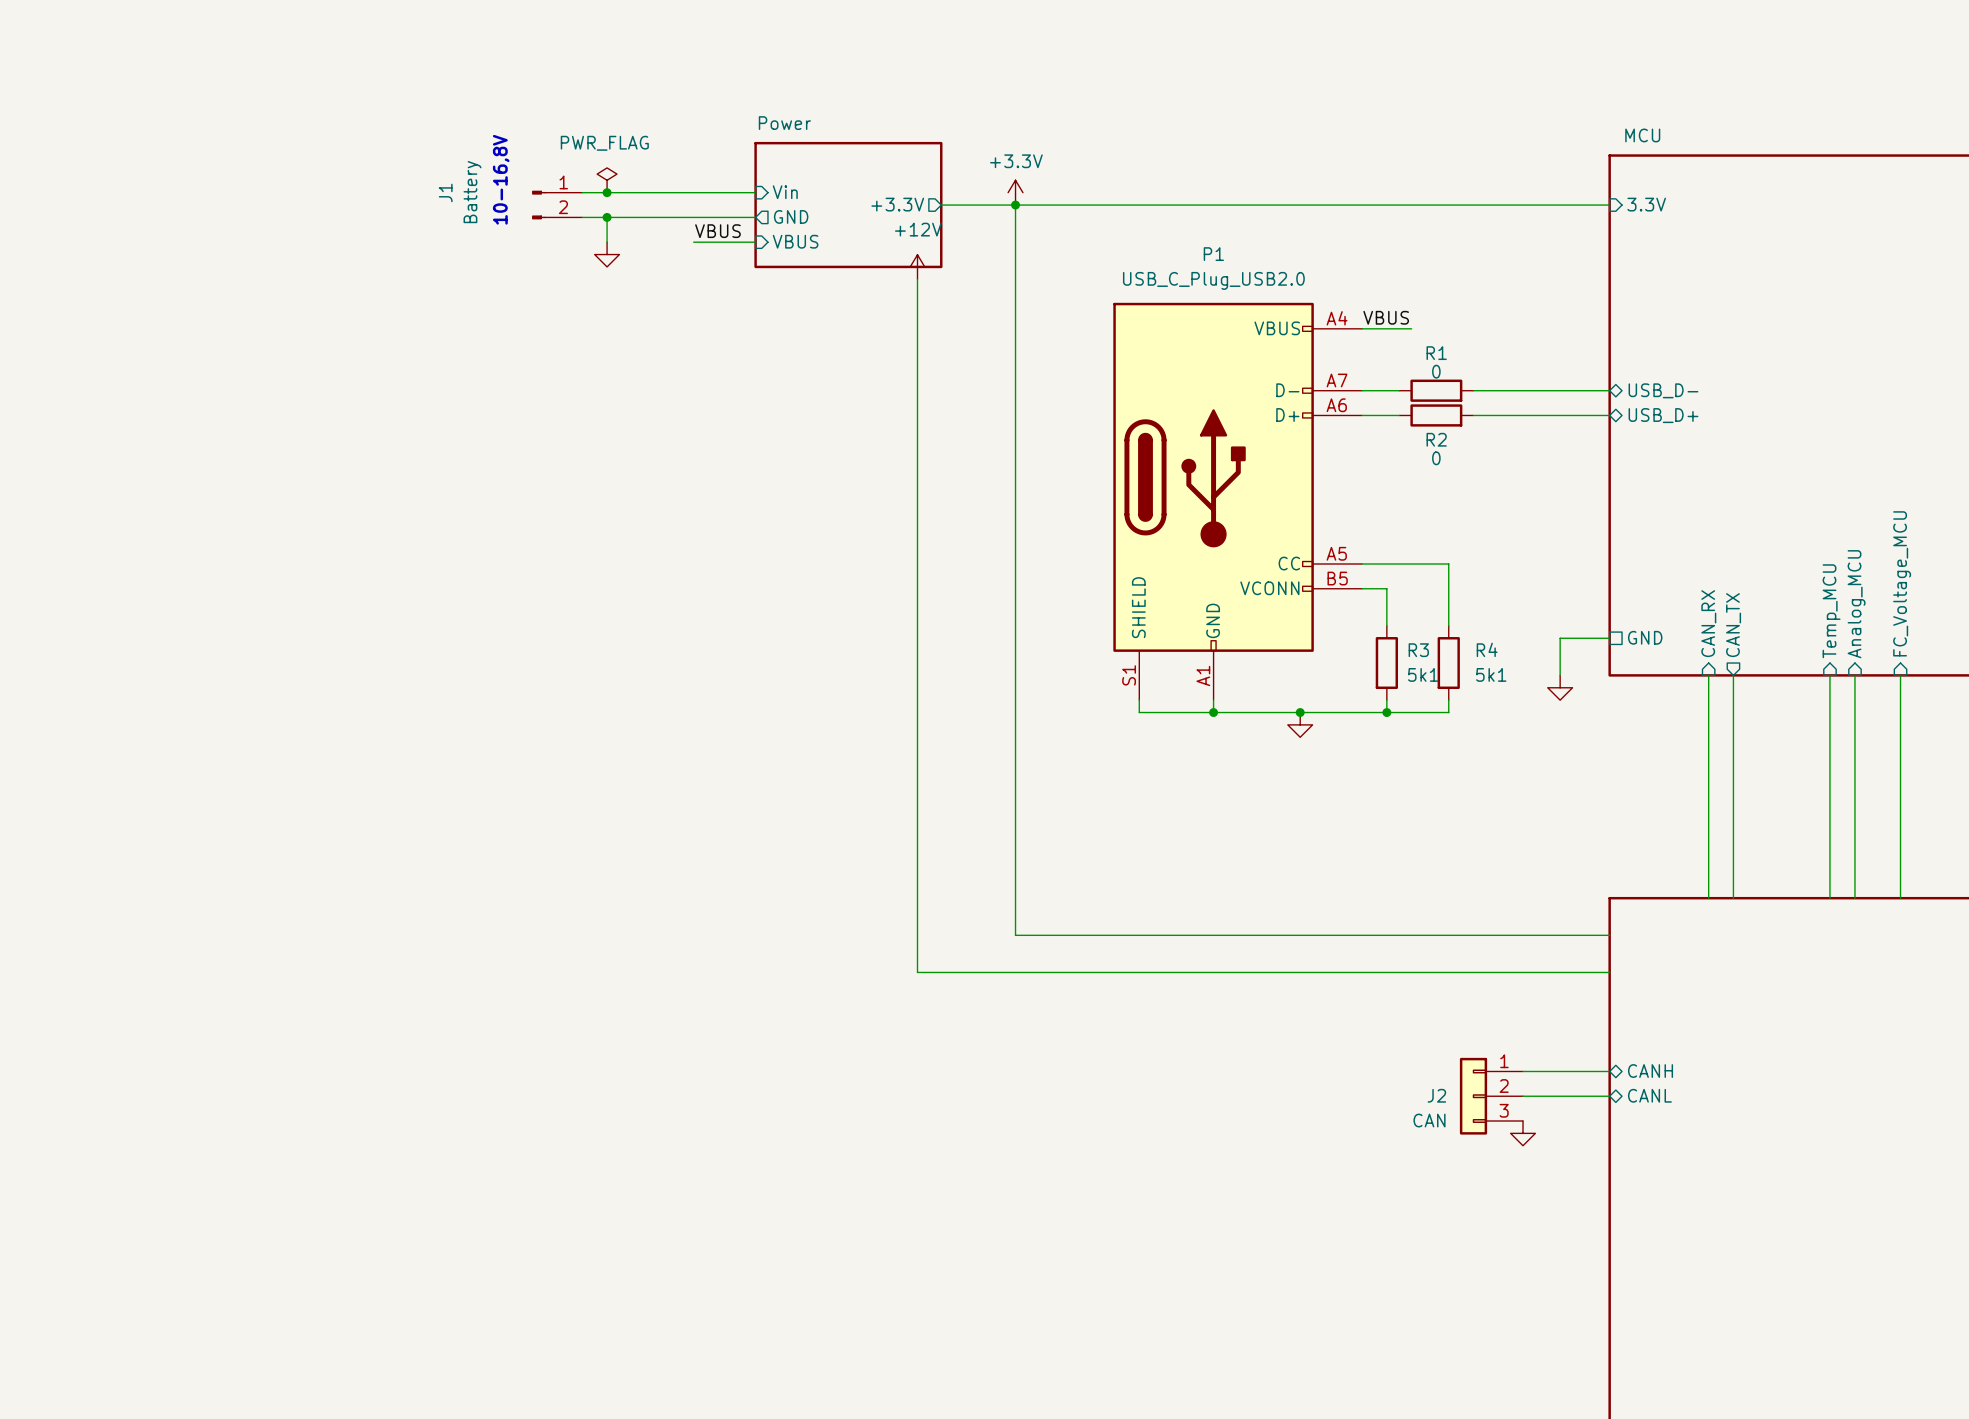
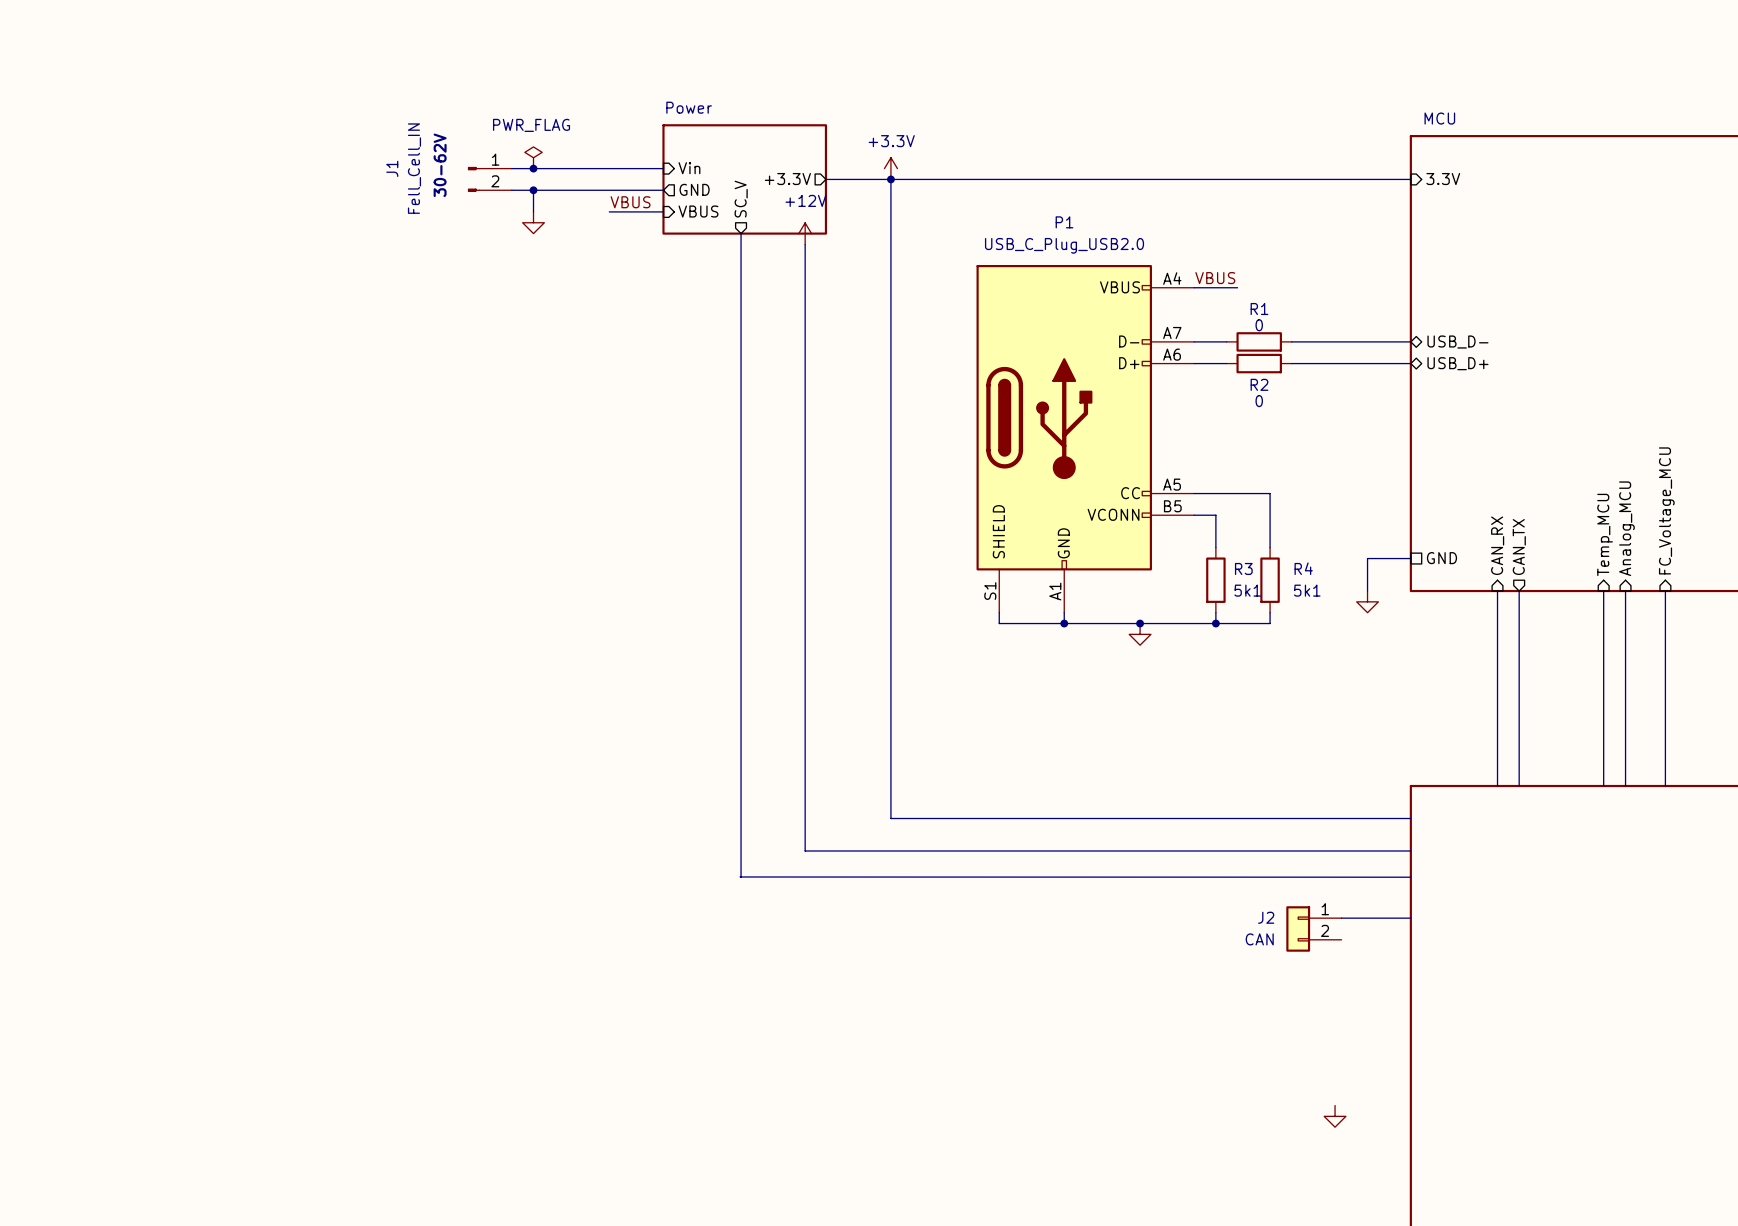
text: 10-16,8V (501, 179) -> 30-62V (440, 165)
J1 value: Battery (472, 192) -> Fell_Cell_IN (414, 168)
sheet pin: none -> SC_V (741, 199)
wire: none -> (741, 233) (740, 876) (1410, 877)
wire: none -> (1341, 918) (1410, 918)
J2 symbol: [1459, 1057, 1524, 1135] -> [1286, 906, 1342, 952]
wire: (1523, 1071) (1609, 1071) -> none
sheet pin: CANH (1650, 1071) -> none
sheet pin: CANL (1649, 1095) -> none
wire: (1523, 1096) (1609, 1096) -> none
power symbol position: (1523, 1133) -> (1335, 1116)

